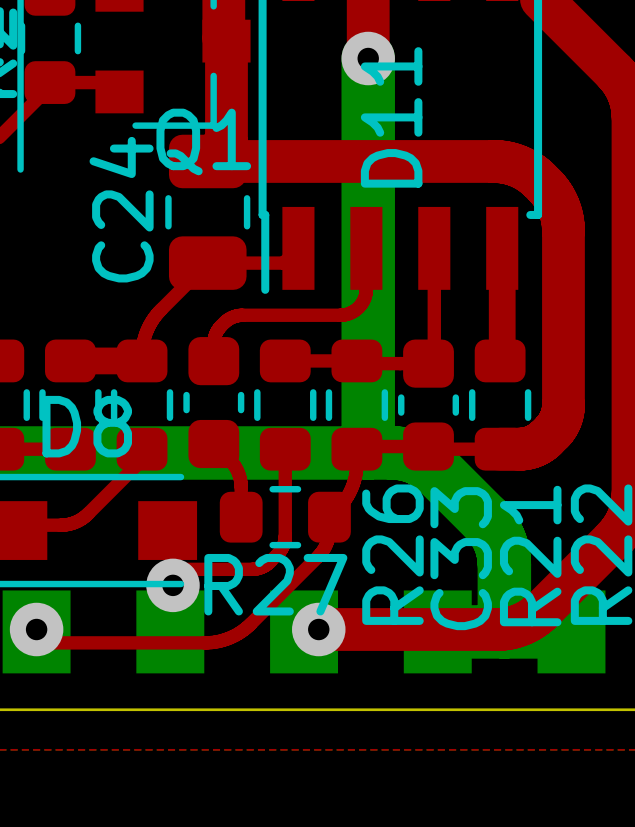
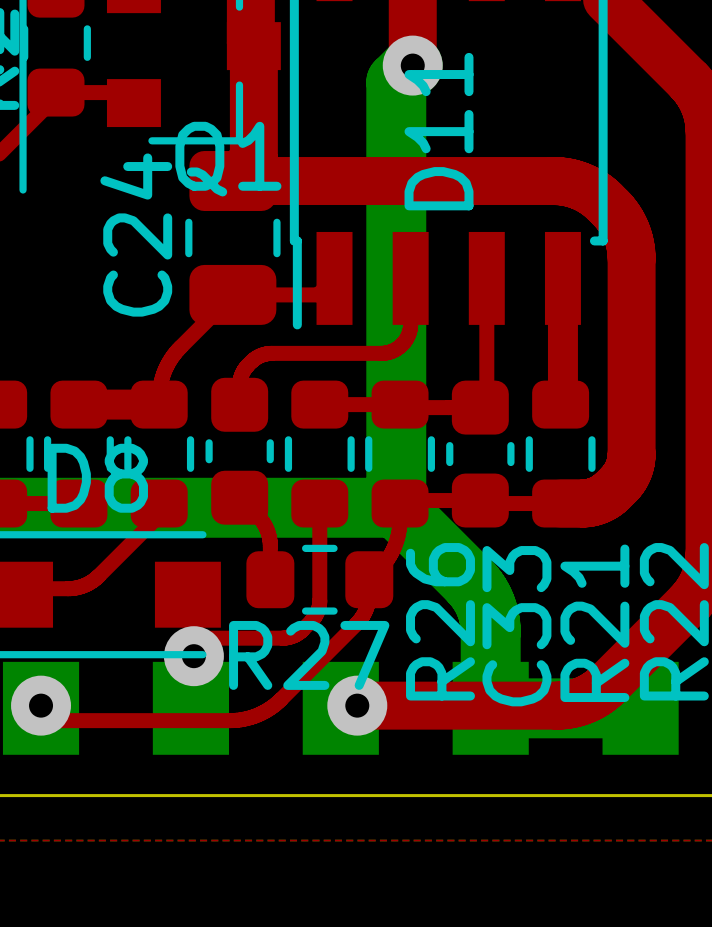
bottom track: (368, 58) (368, 452) -> (412, 65) (396, 82) (396, 507) (471, 583) (483, 601) (490, 628) (490, 708)
bottom track: (353, 452) (398, 453) (422, 460) (435, 469) (489, 524) (499, 540) (503, 555) (504, 631) -> none

